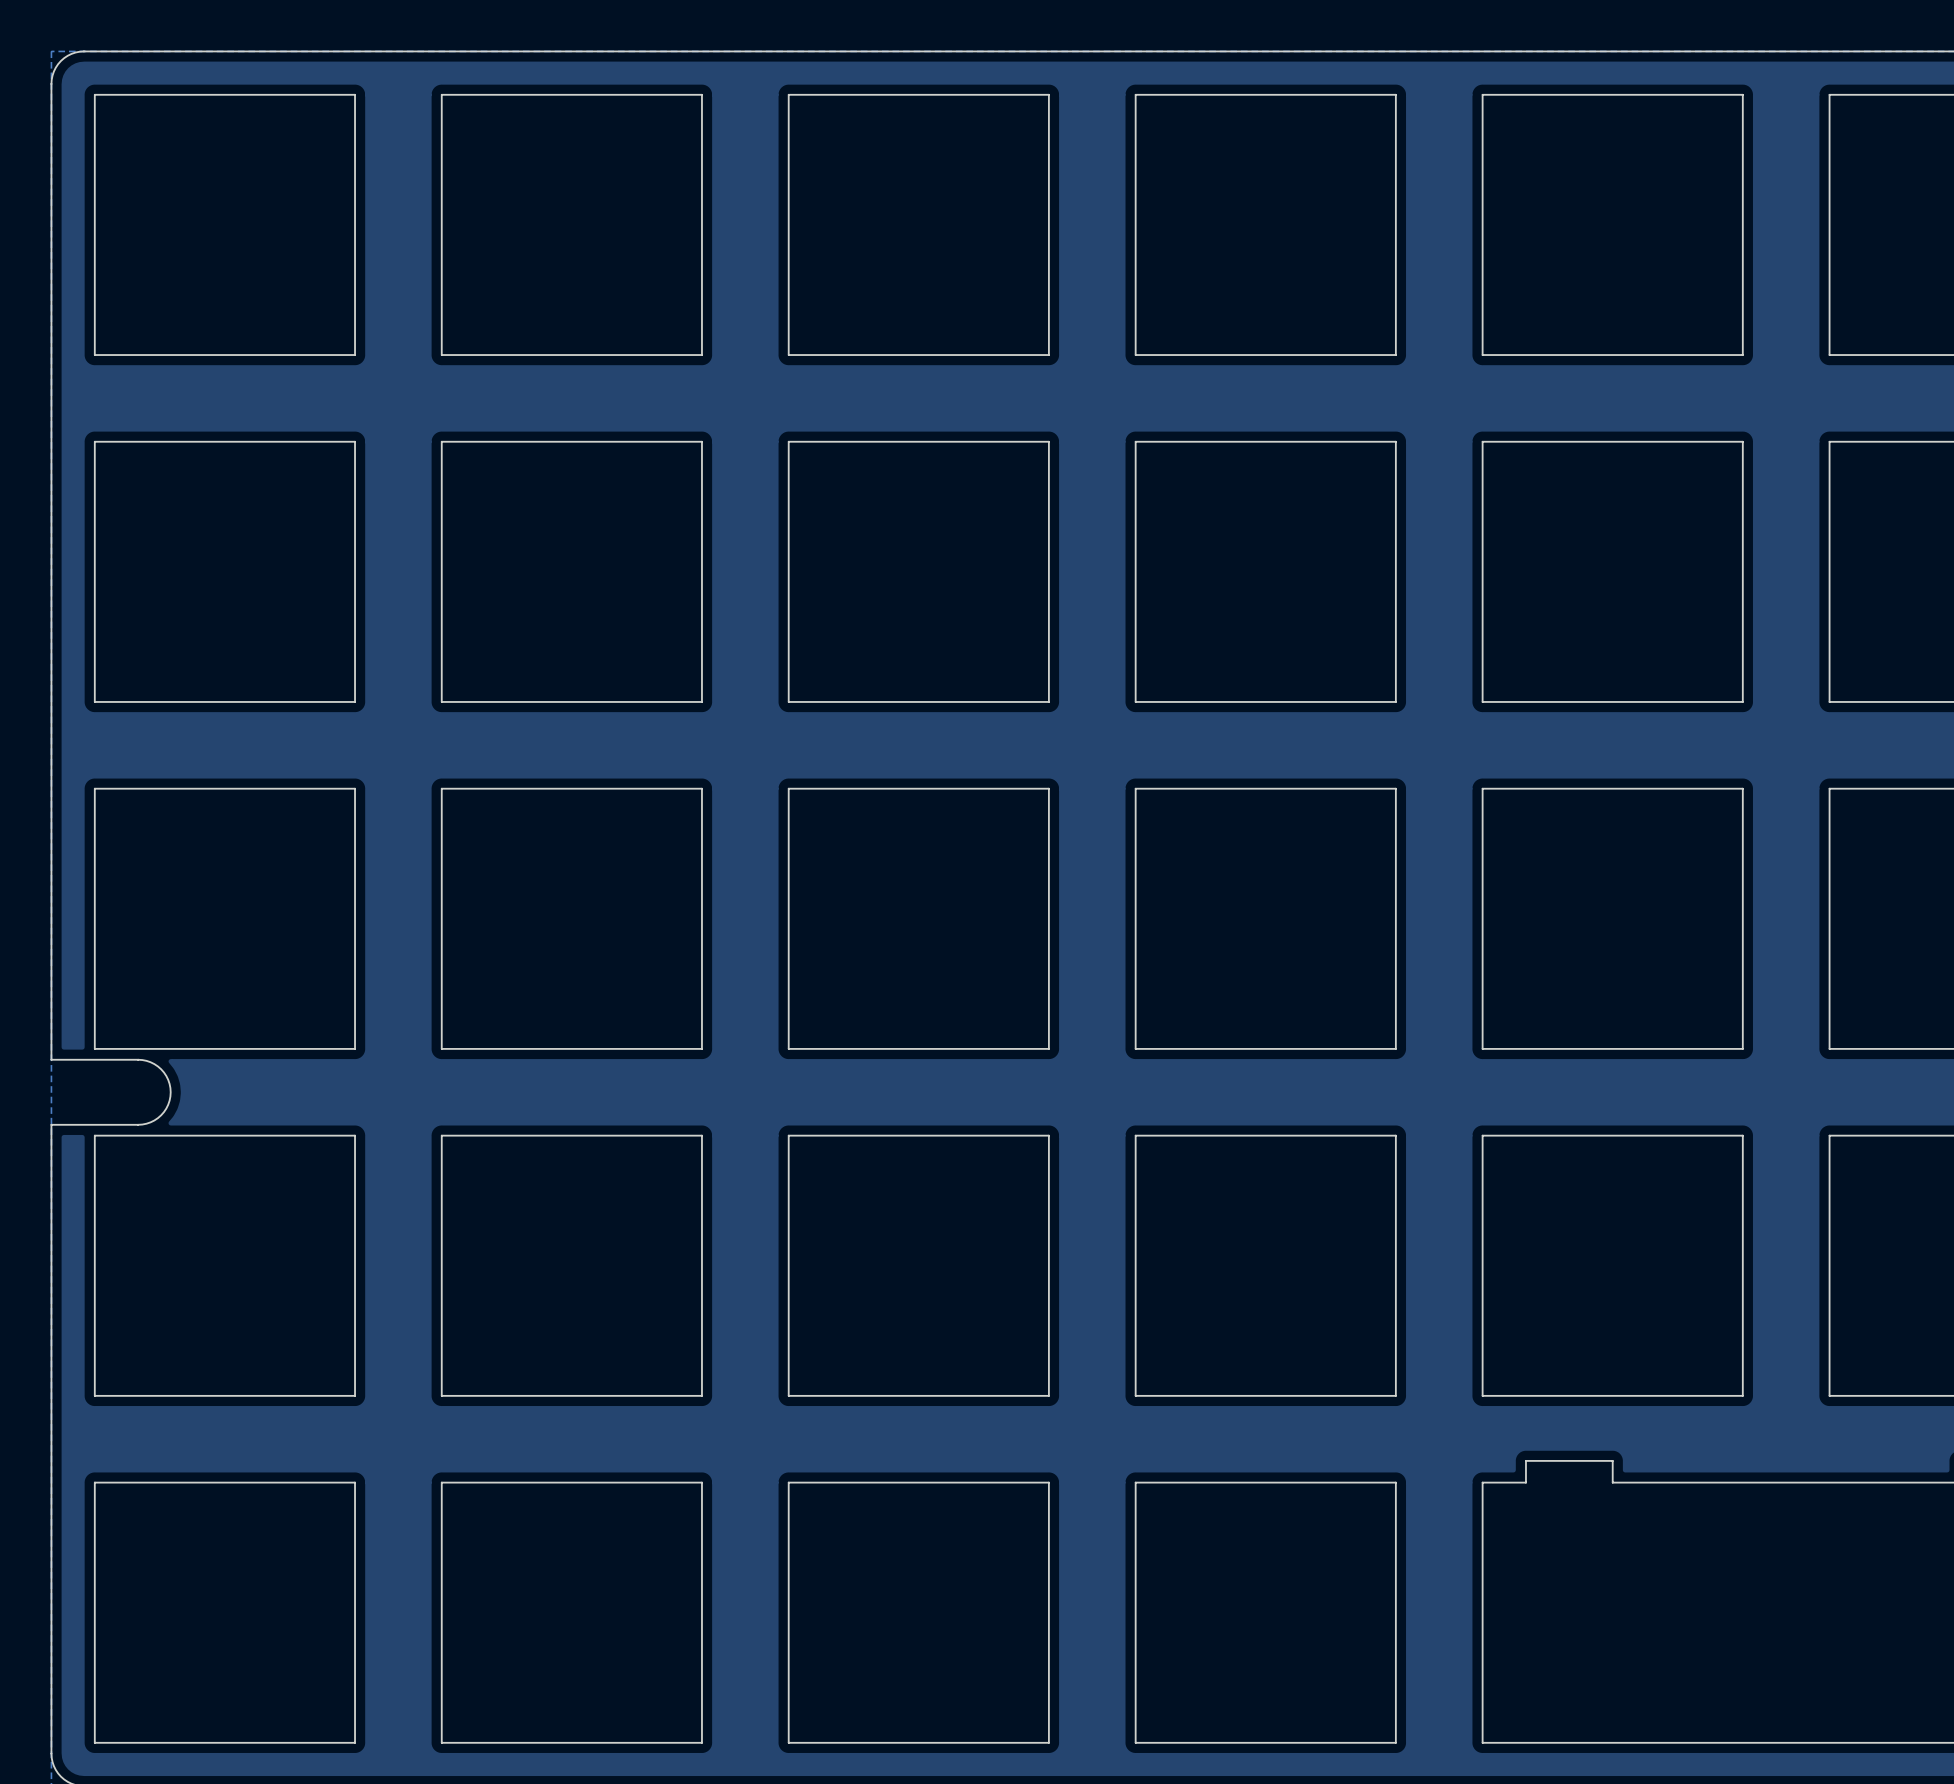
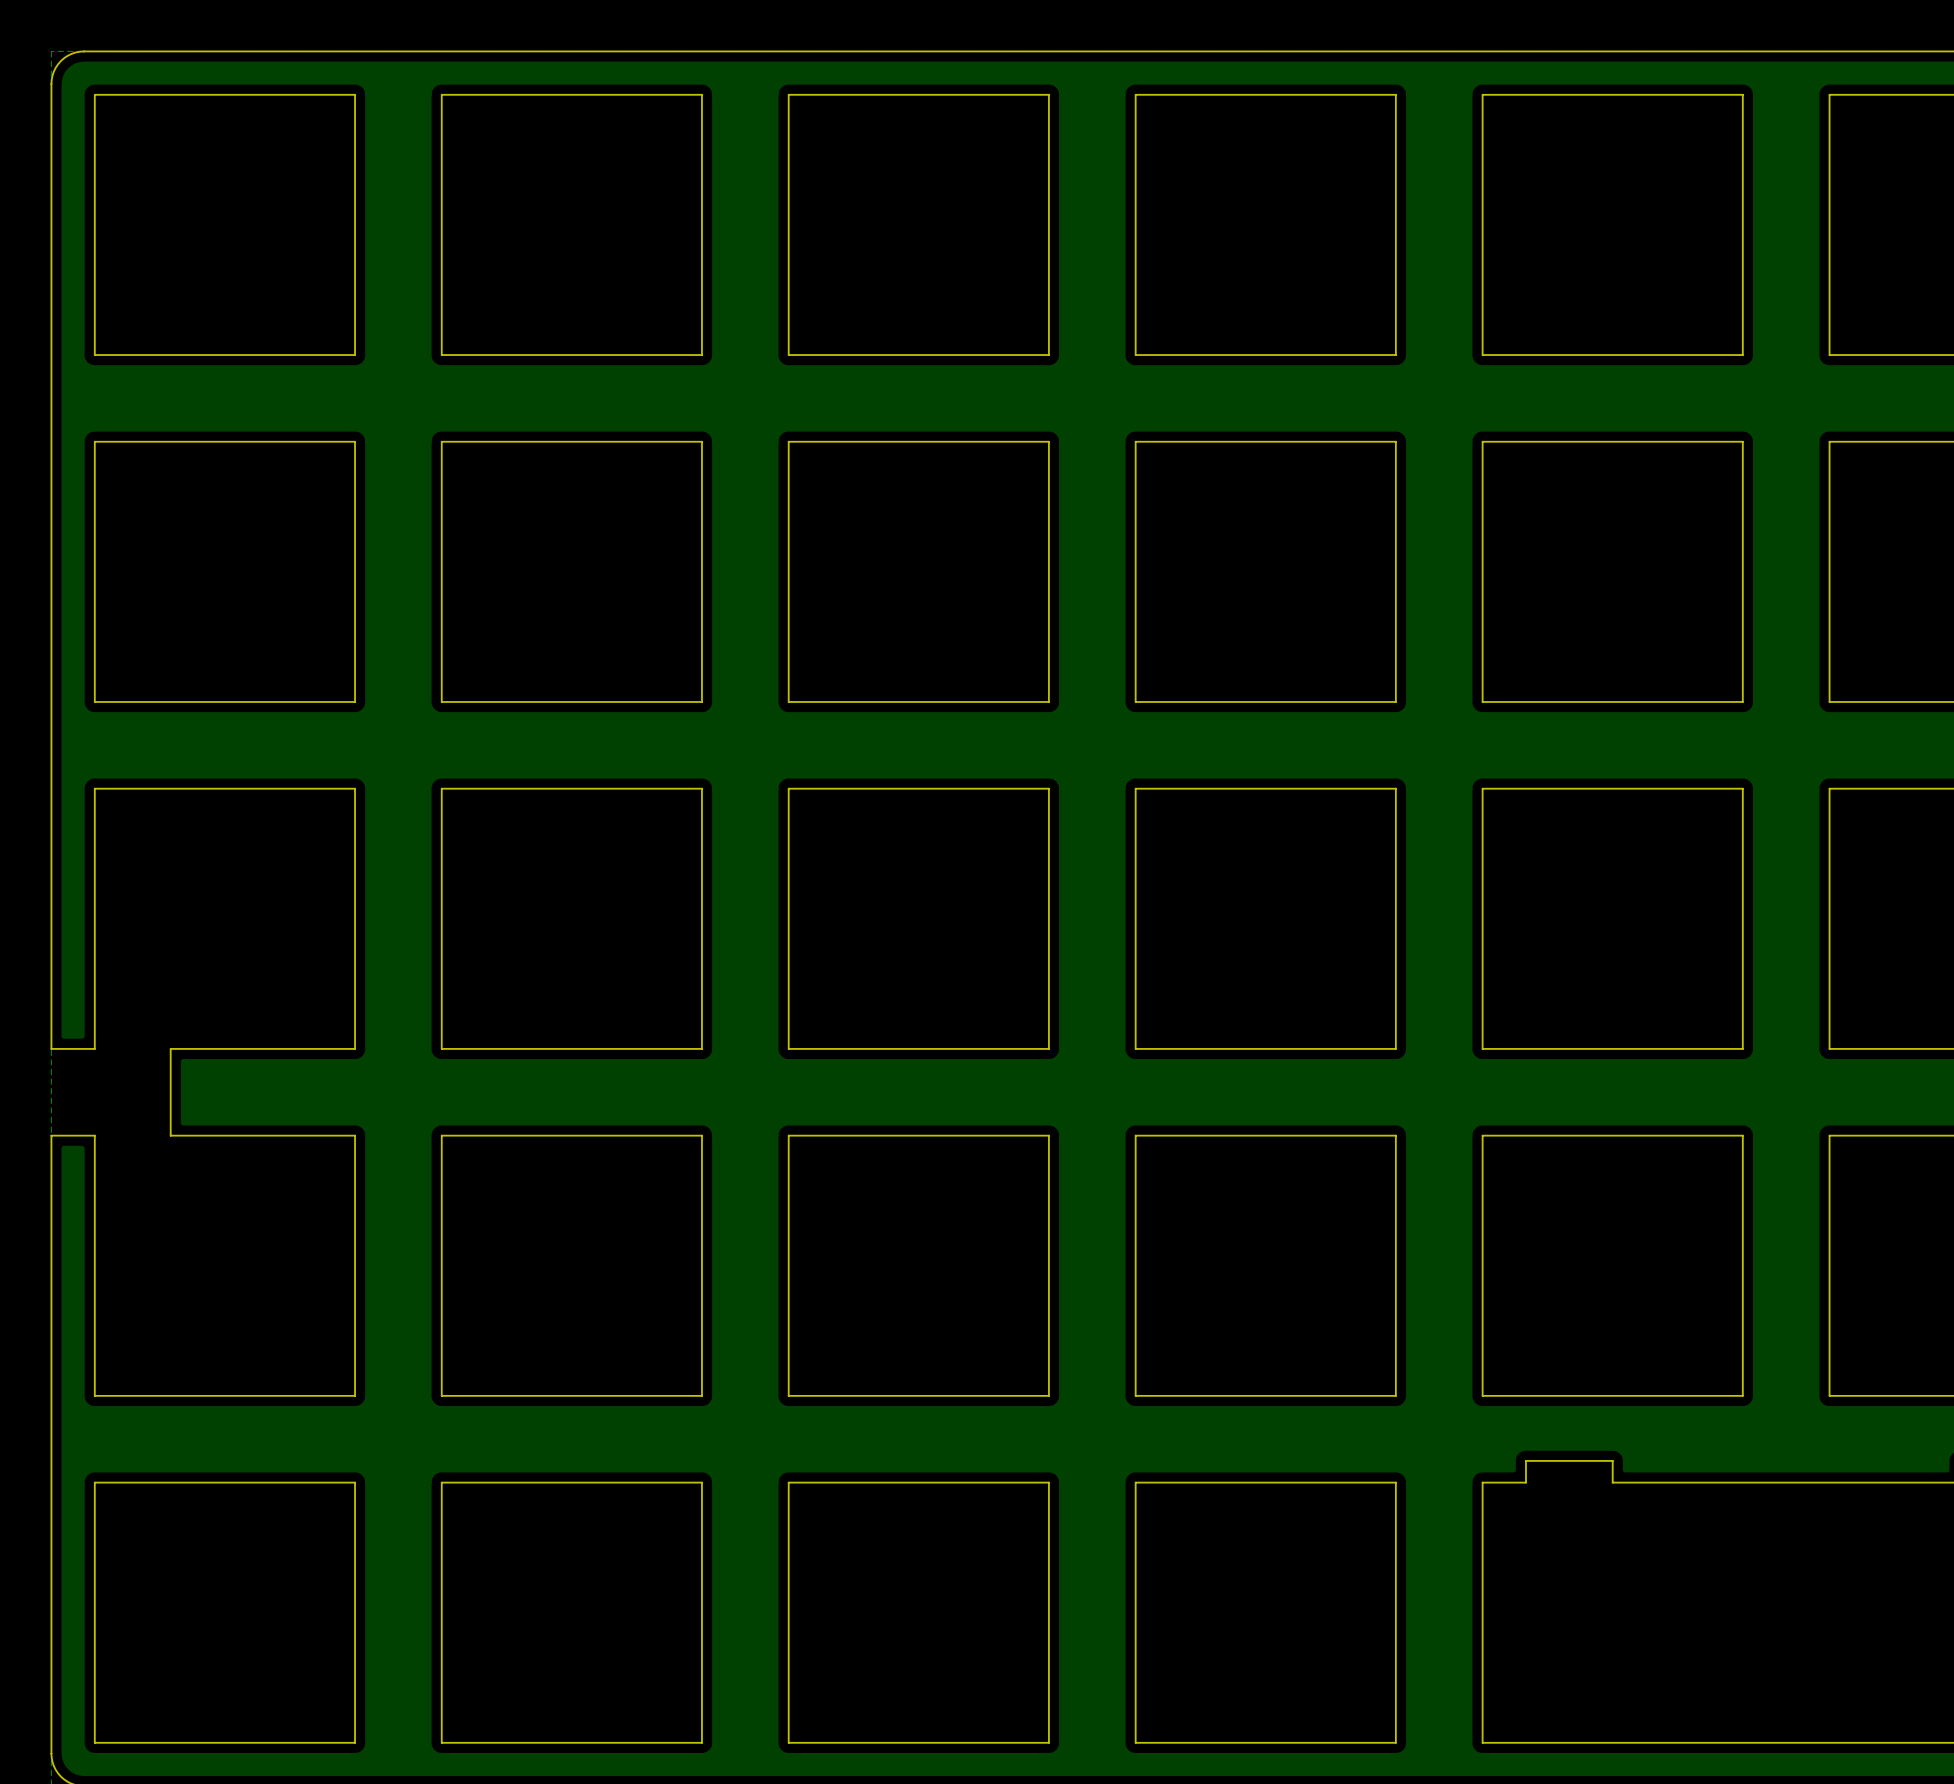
board edge: (51, 1048) (51, 1059) (138, 1059) (150, 1062) (163, 1072) (168, 1079) (170, 1092) (168, 1104) (163, 1112) (150, 1122) (138, 1124) (51, 1124) (51, 1135) -> (51, 1048) (94, 1048)
board edge: (170, 1048) (94, 1048) -> none
board edge: none -> (94, 1135) (51, 1135)
board edge: (170, 1135) (94, 1135) -> (170, 1135) (170, 1048)

